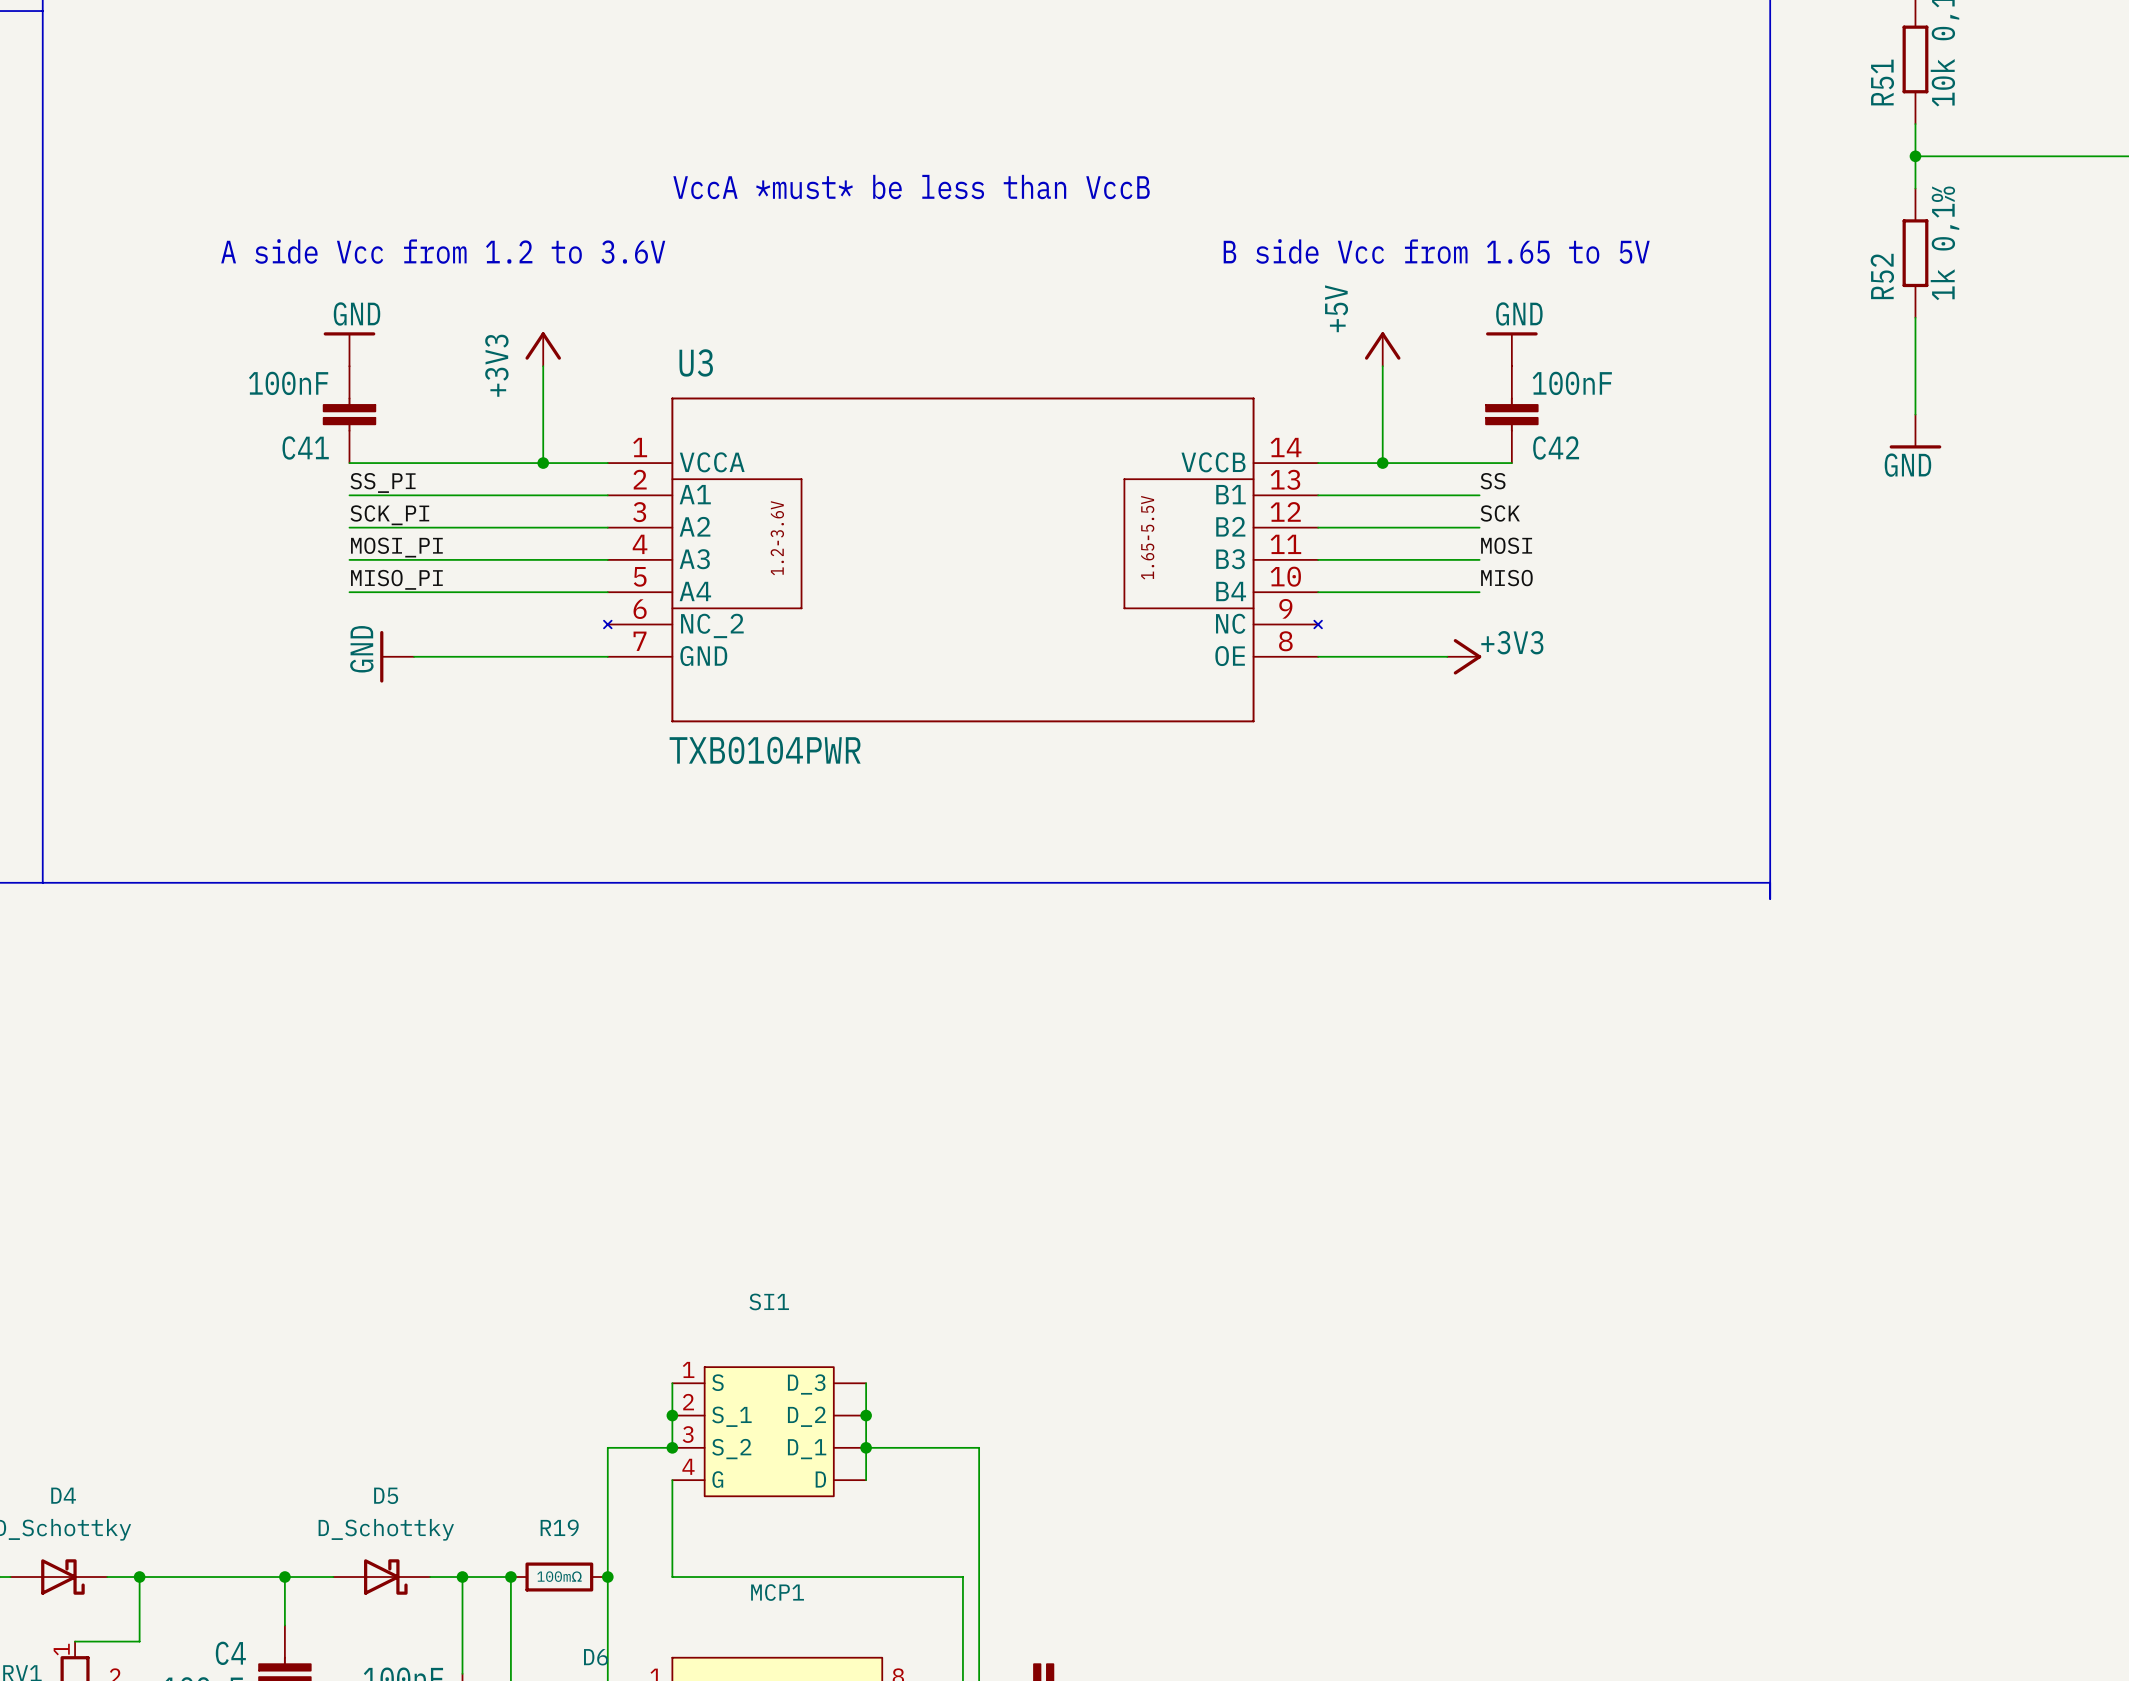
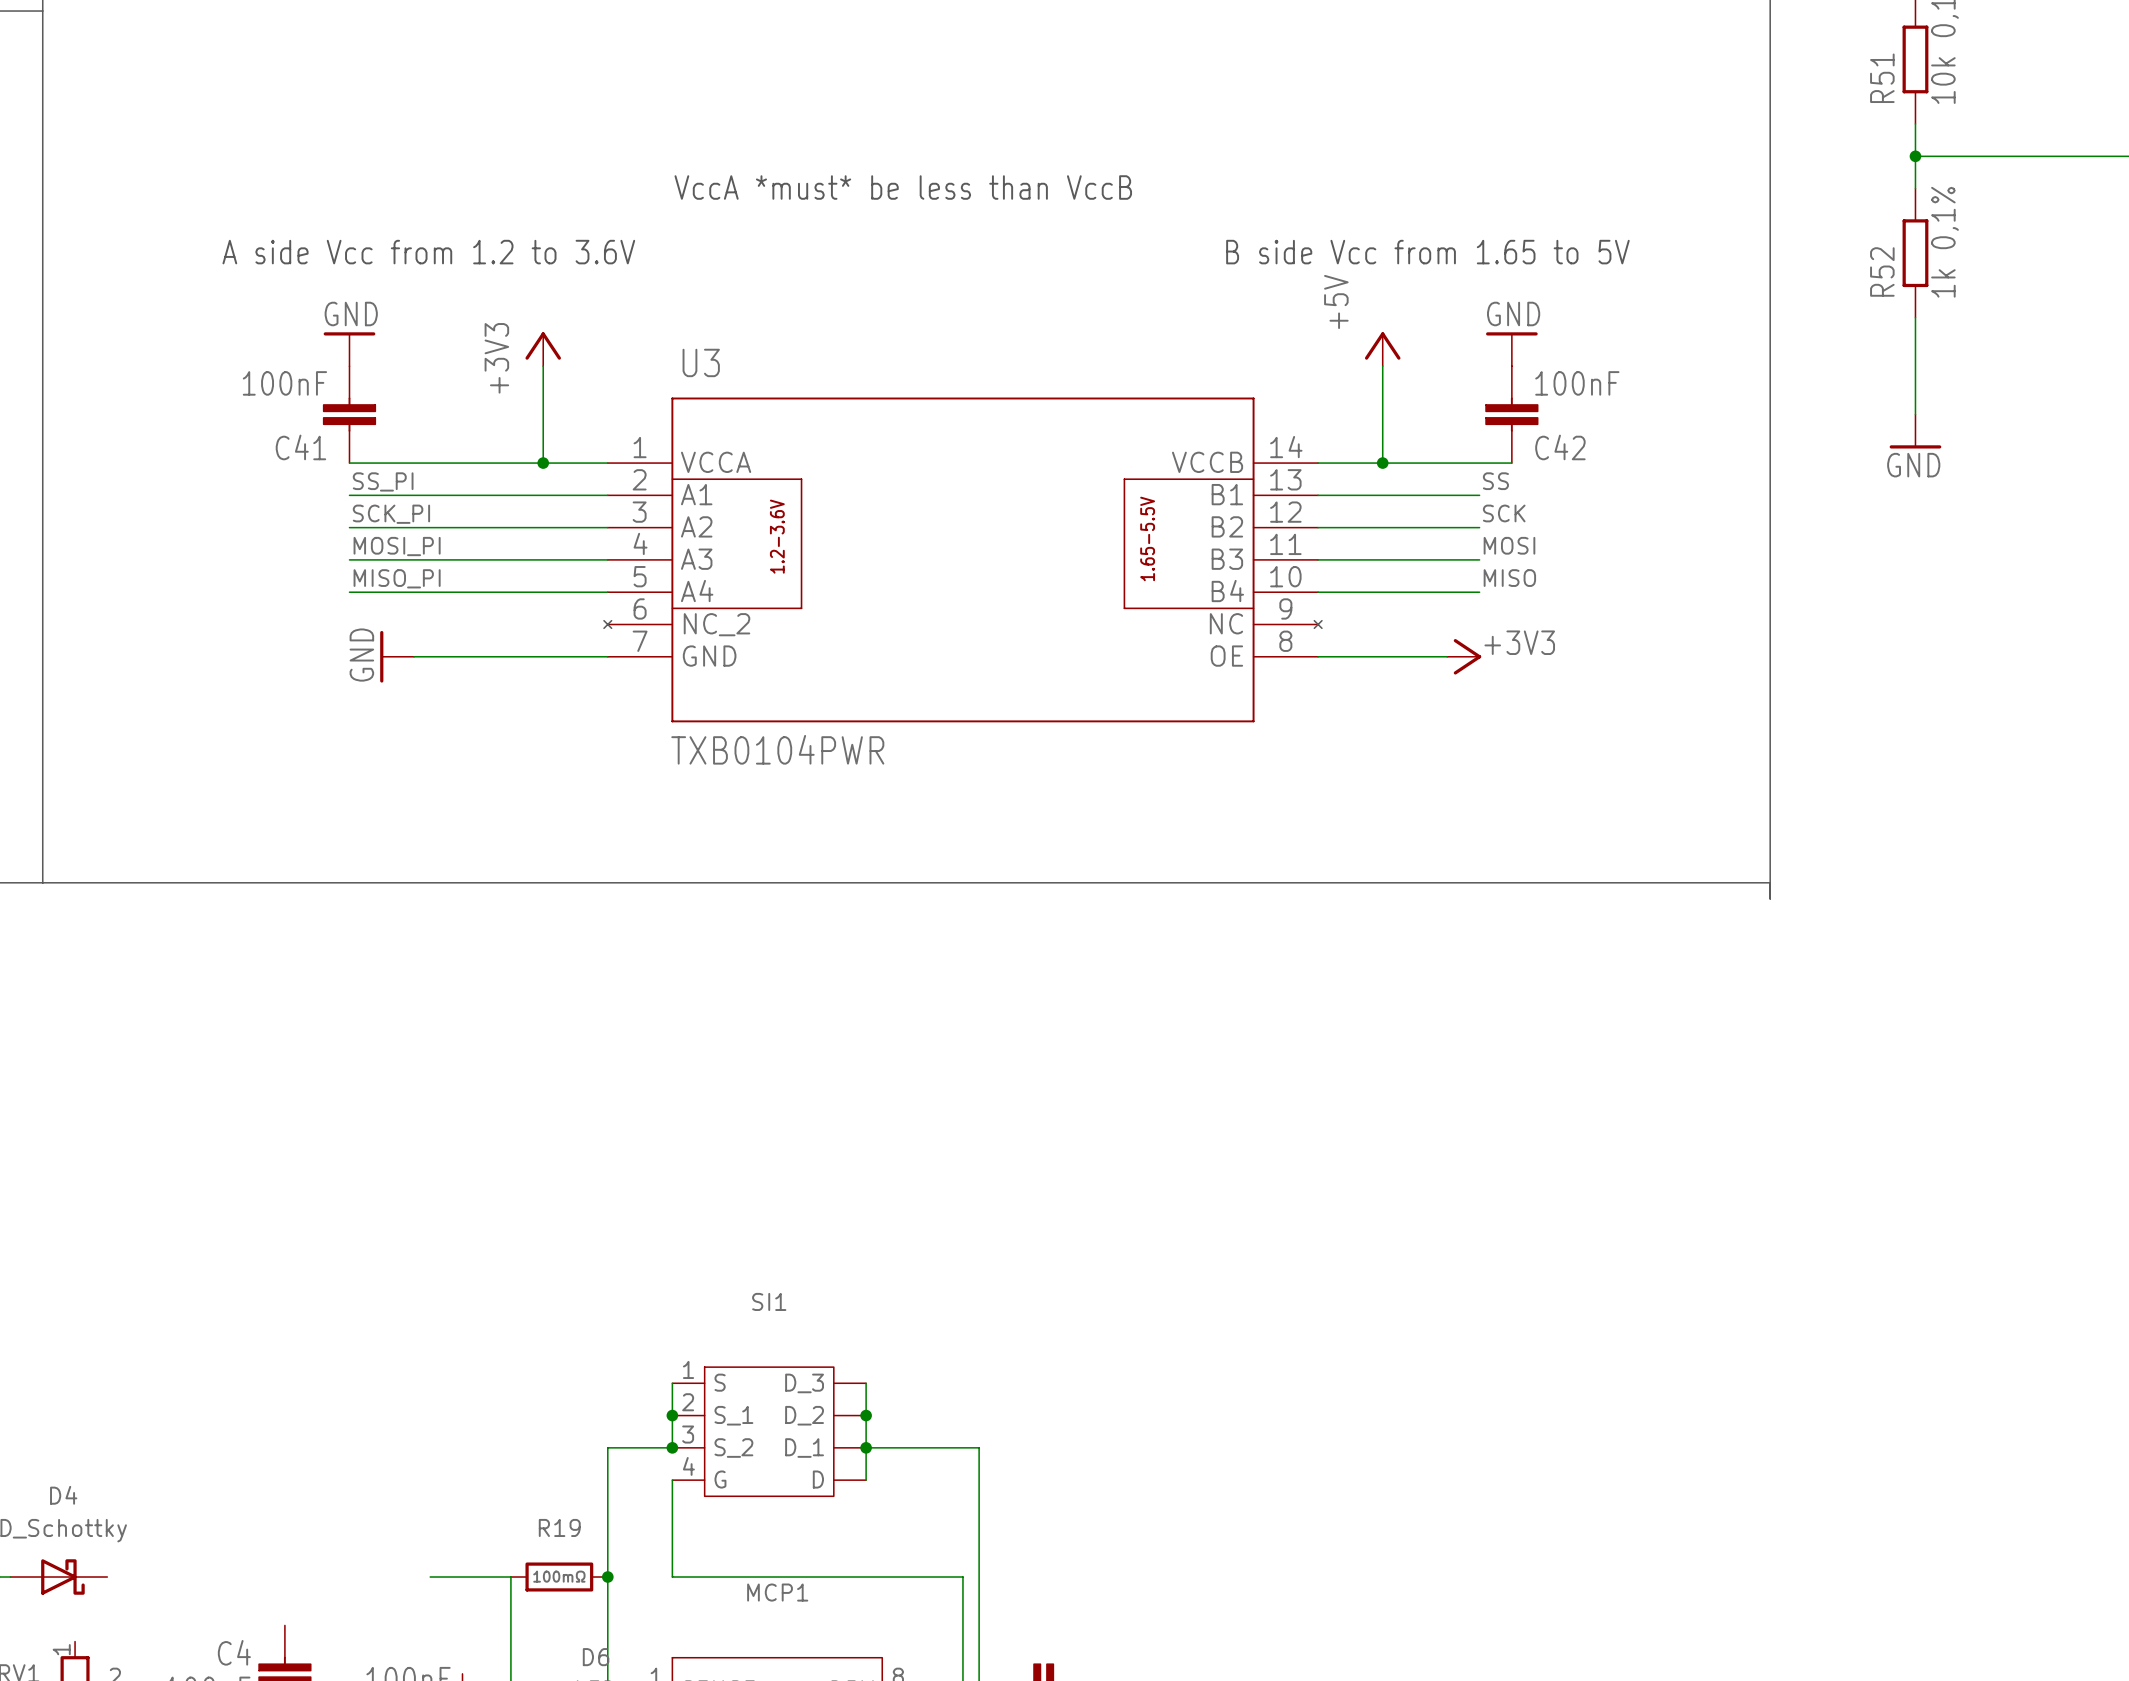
wire: (107, 1577) (333, 1577) -> none
wire: (139, 1577) (139, 1641) (75, 1641) -> none
junction: (139, 1577) -> none
wire: (284, 1577) (284, 1625) -> none
junction: (284, 1577) -> none
D5: D_Schottky (381, 1577) -> none
wire: (462, 1577) (462, 1673) -> none
junction: (462, 1577) -> none
junction: (510, 1577) -> none

